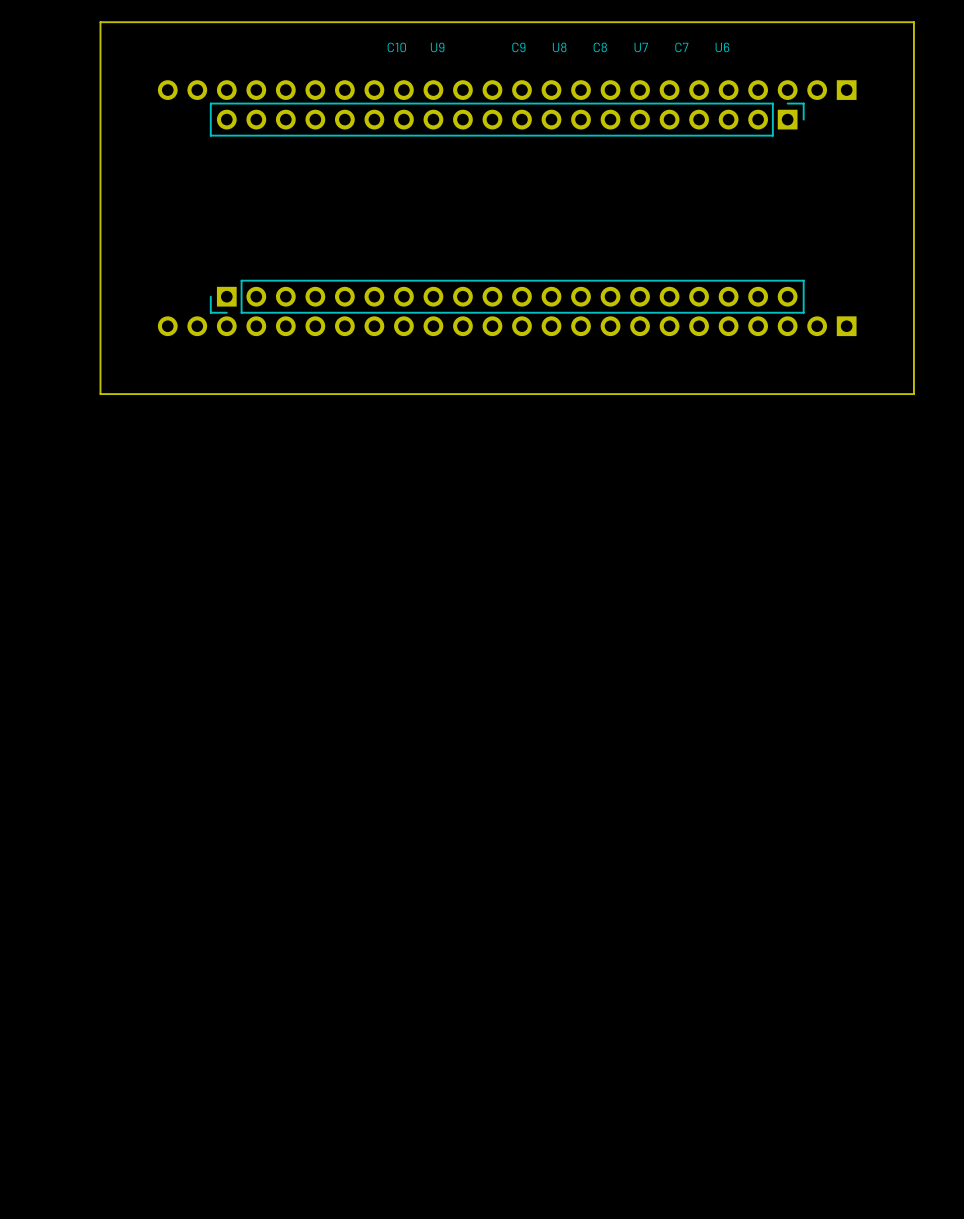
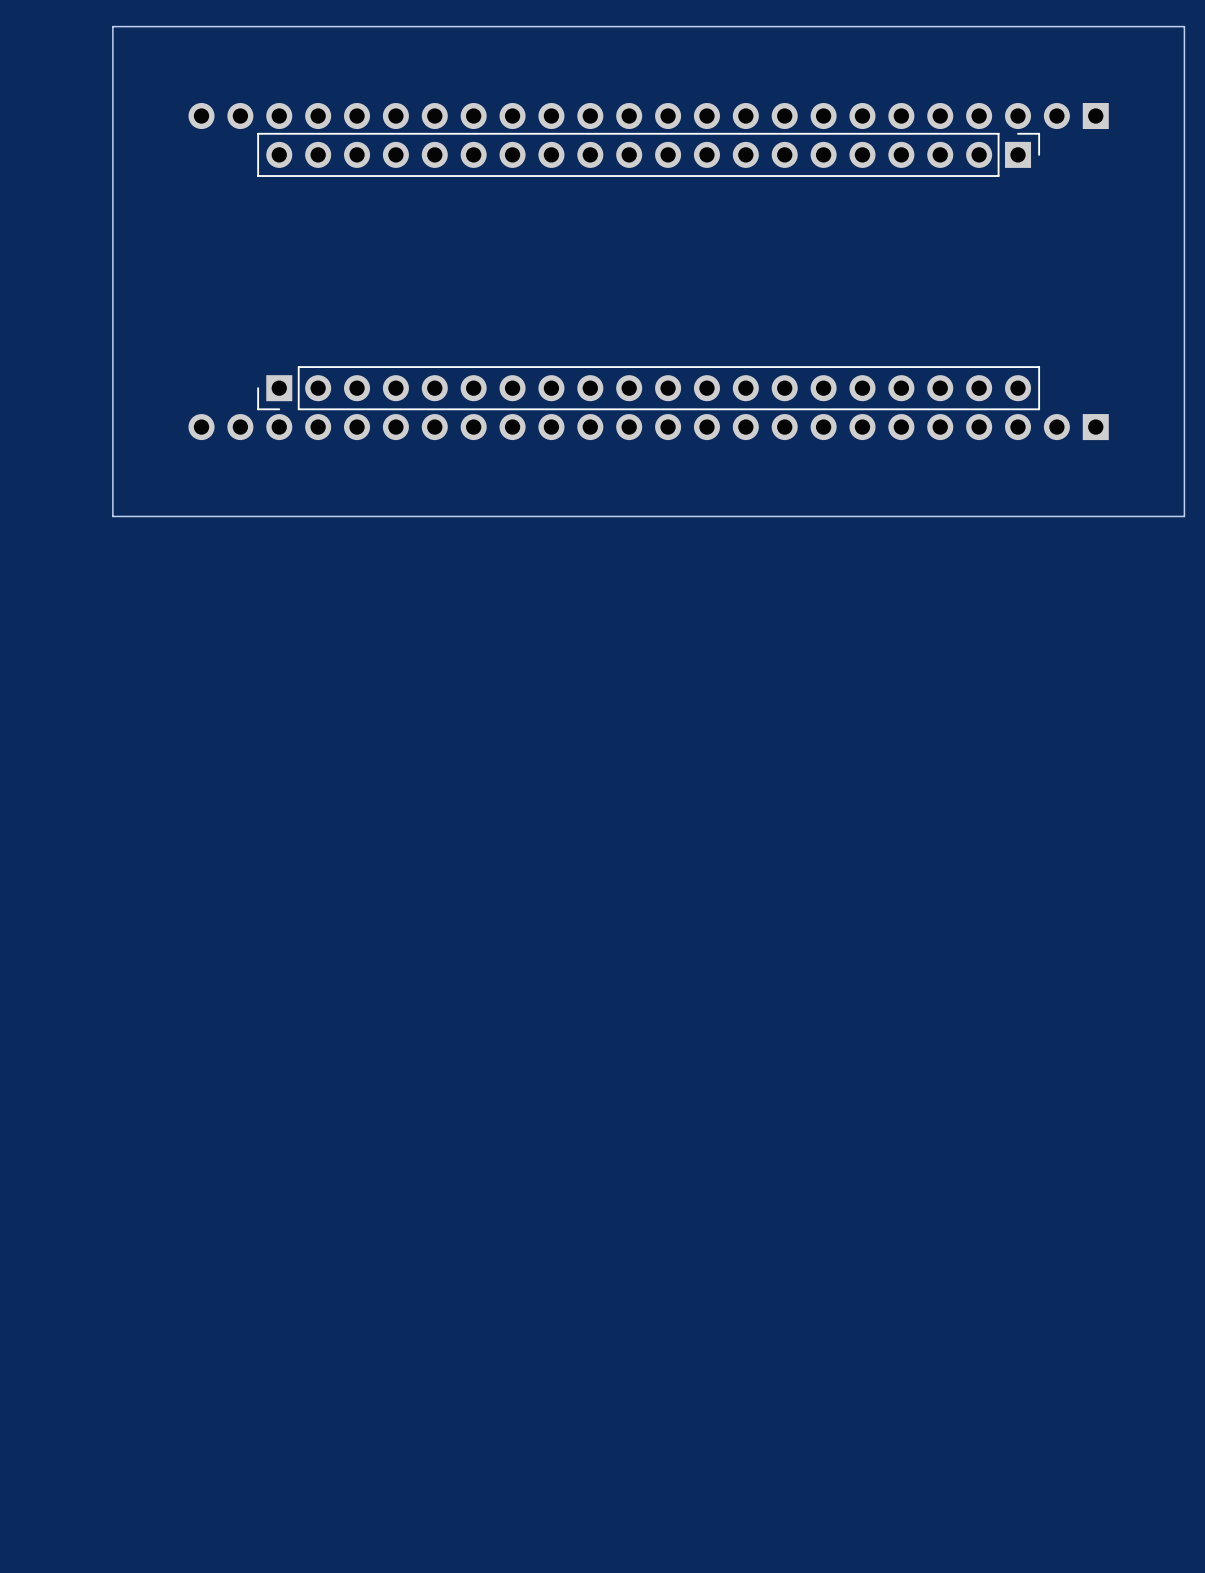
C10: (396, 47) -> none
U9: (437, 47) -> none
C9: (518, 47) -> none
U8: (559, 47) -> none
C8: (600, 47) -> none
U7: (641, 47) -> none
C7: (681, 47) -> none
U6: (722, 47) -> none

